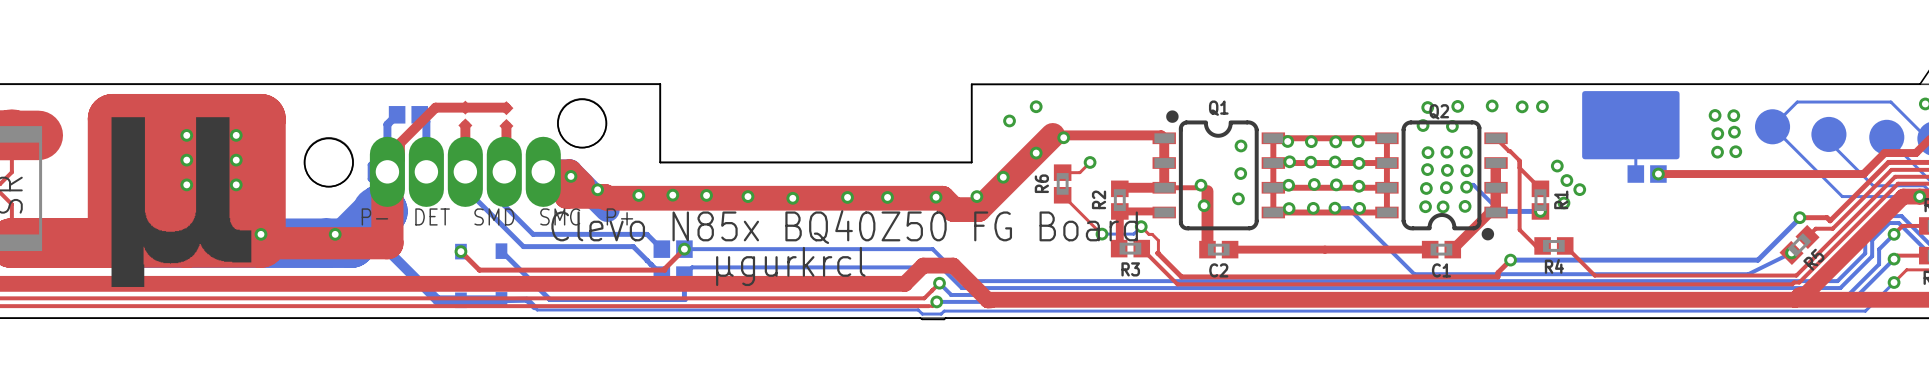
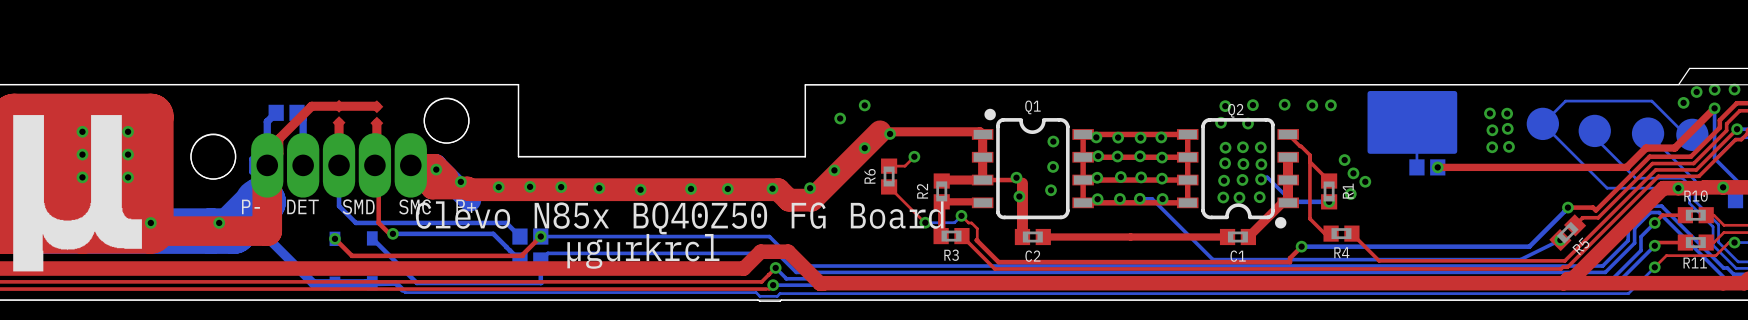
top track: none -> (374, 165) (378, 169) (378, 222) (389, 233) (392, 233)
bottom track: (504, 171) (504, 205) (533, 234) -> (339, 180) (339, 206) (355, 222) (401, 222)
bottom track: (465, 188) (523, 246) (633, 246) -> (392, 233) (493, 234)
via: none -> (392, 233)

